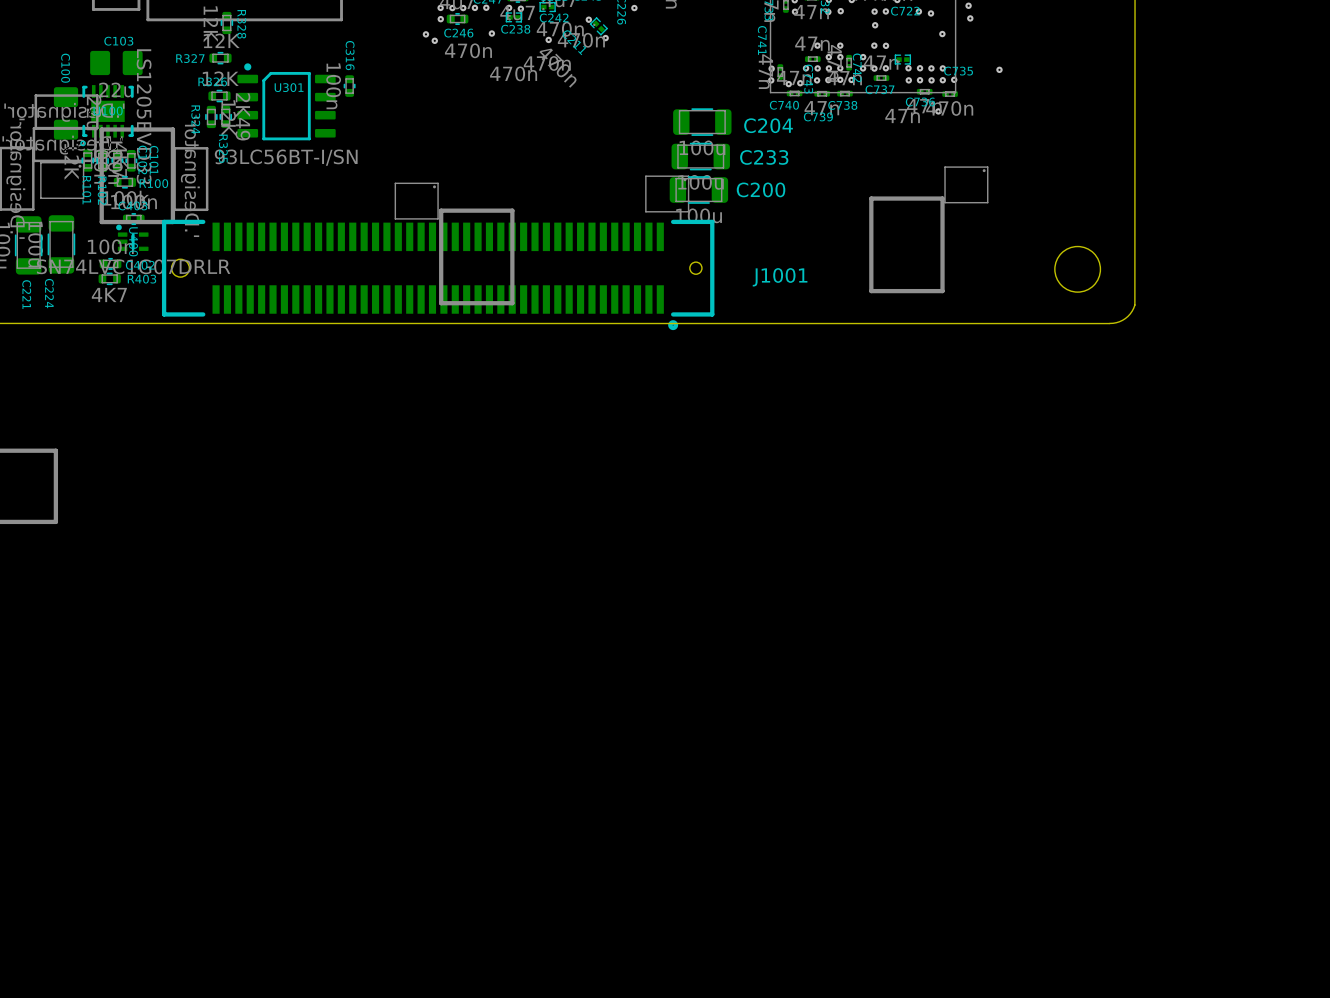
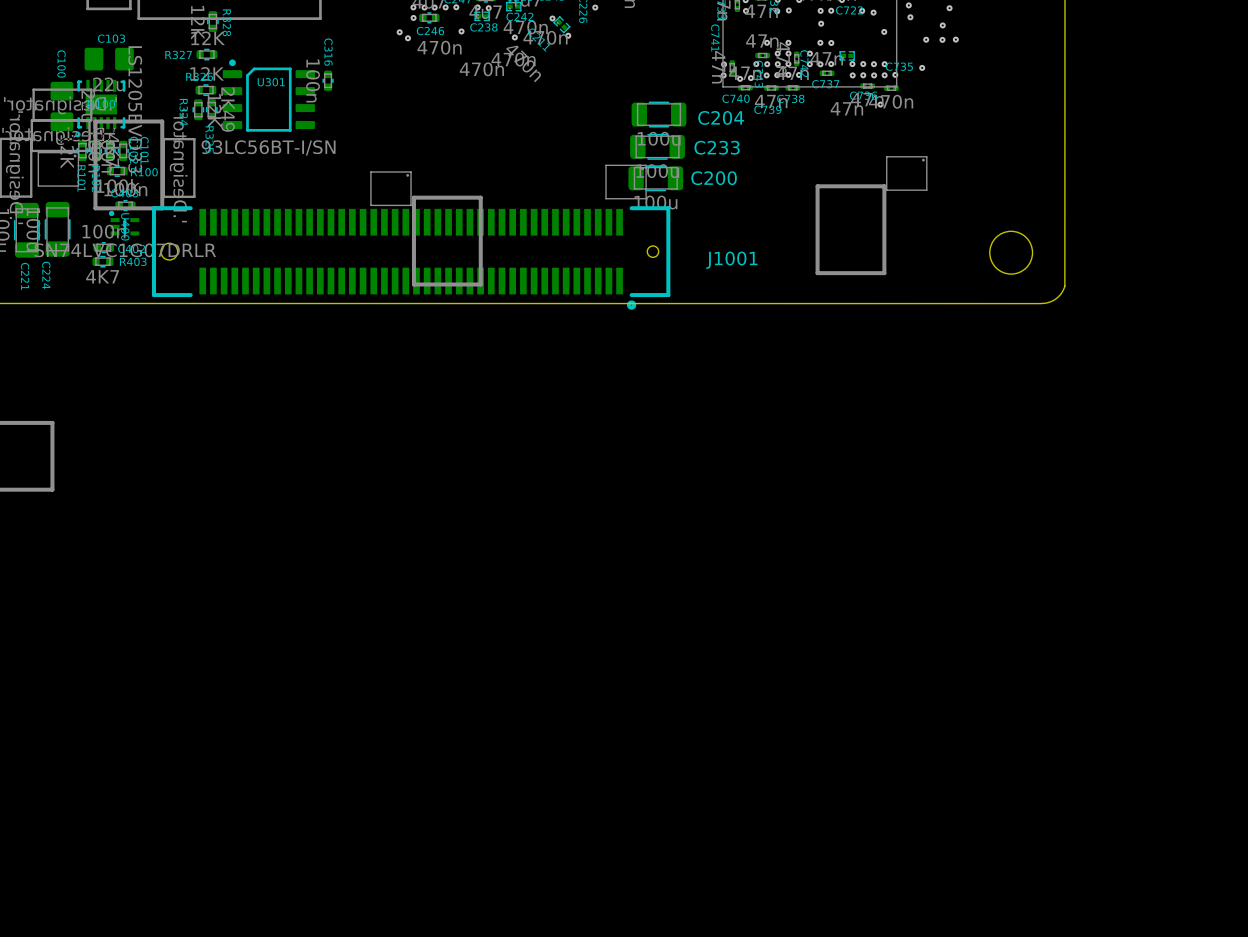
via: none -> (949, 8)
via: none -> (942, 25)
via: none -> (926, 39)
via: none -> (942, 39)
via: none -> (955, 39)
via: (999, 69) -> none
via: none -> (922, 67)

